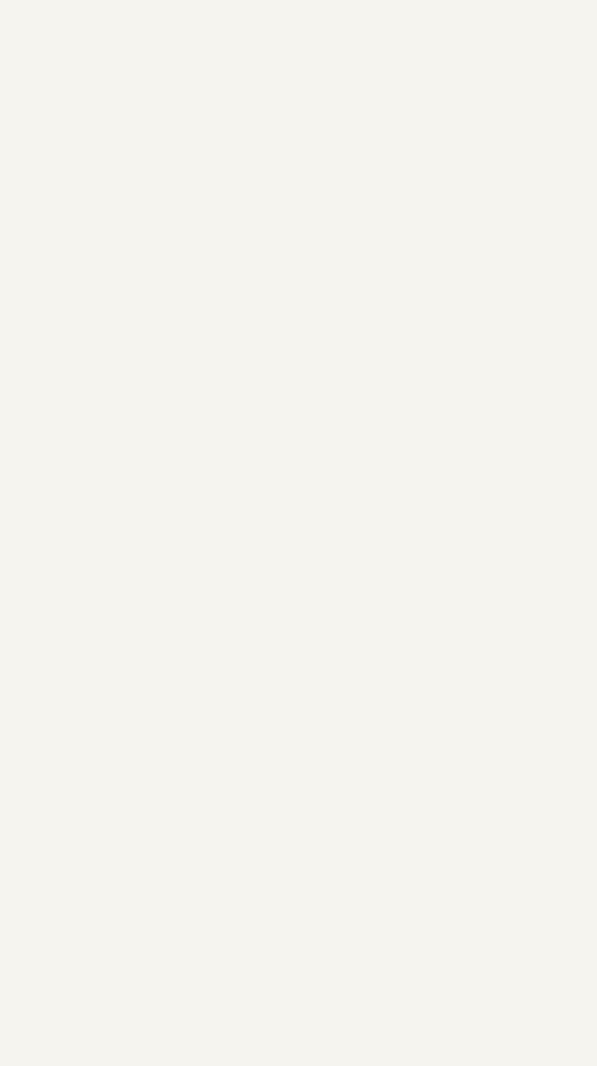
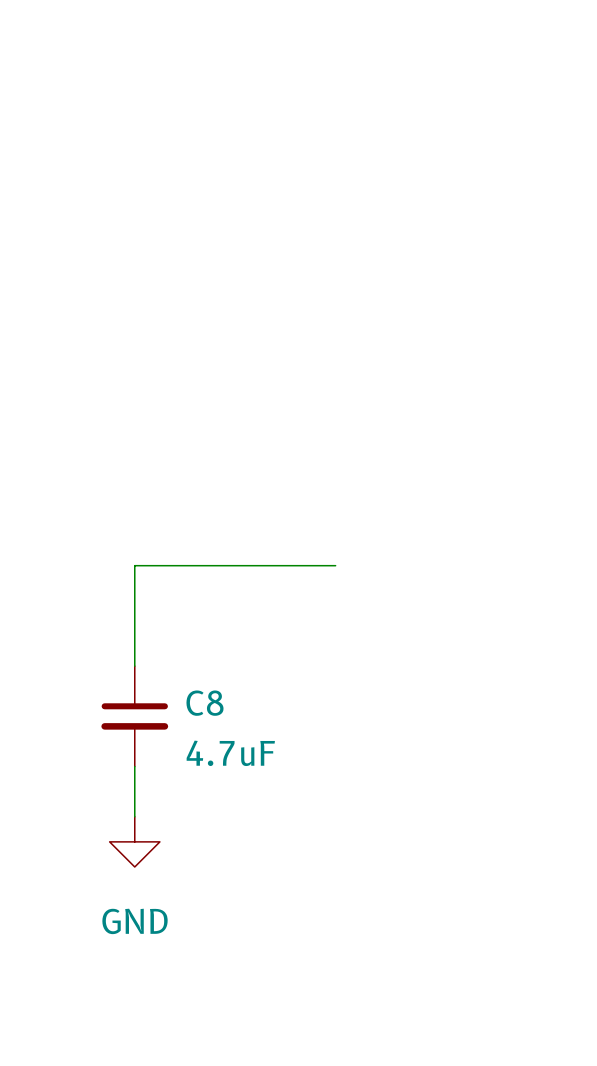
wire: none -> (335, 565) (134, 565) (134, 666)
C8: none -> 4.7uF (134, 716)
wire: none -> (134, 766) (134, 816)
power symbol: none -> GND (134, 841)

